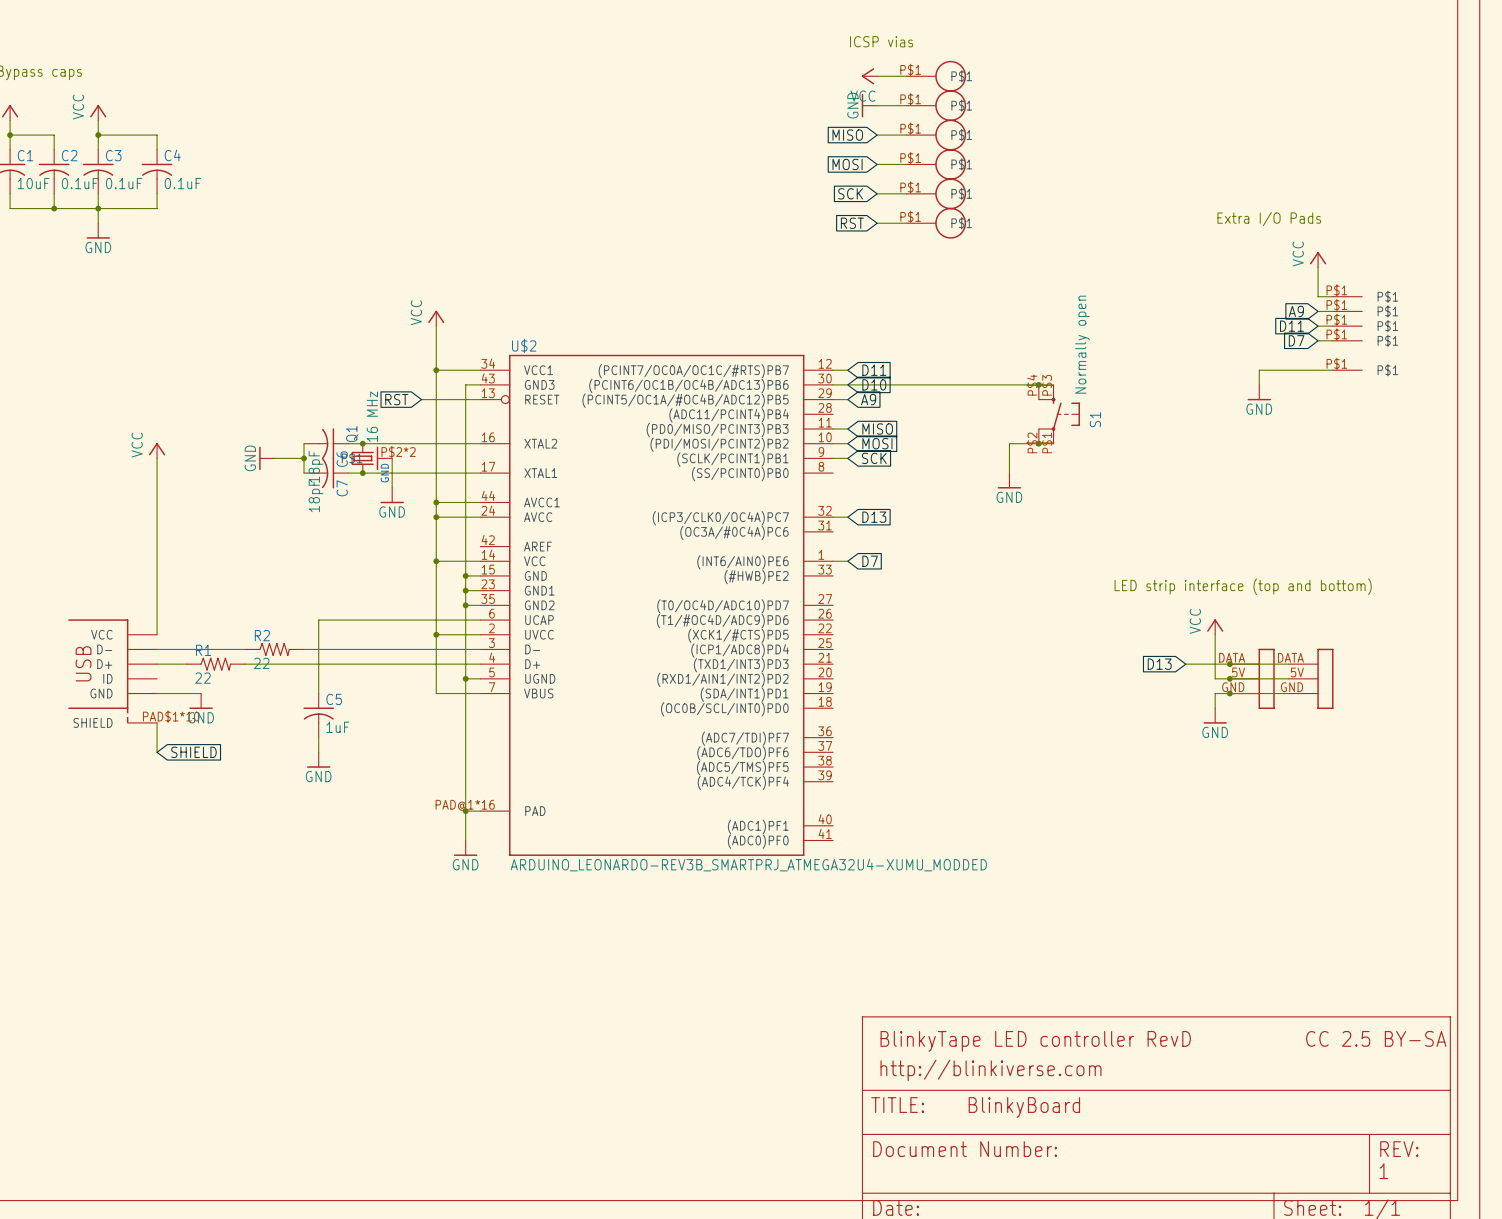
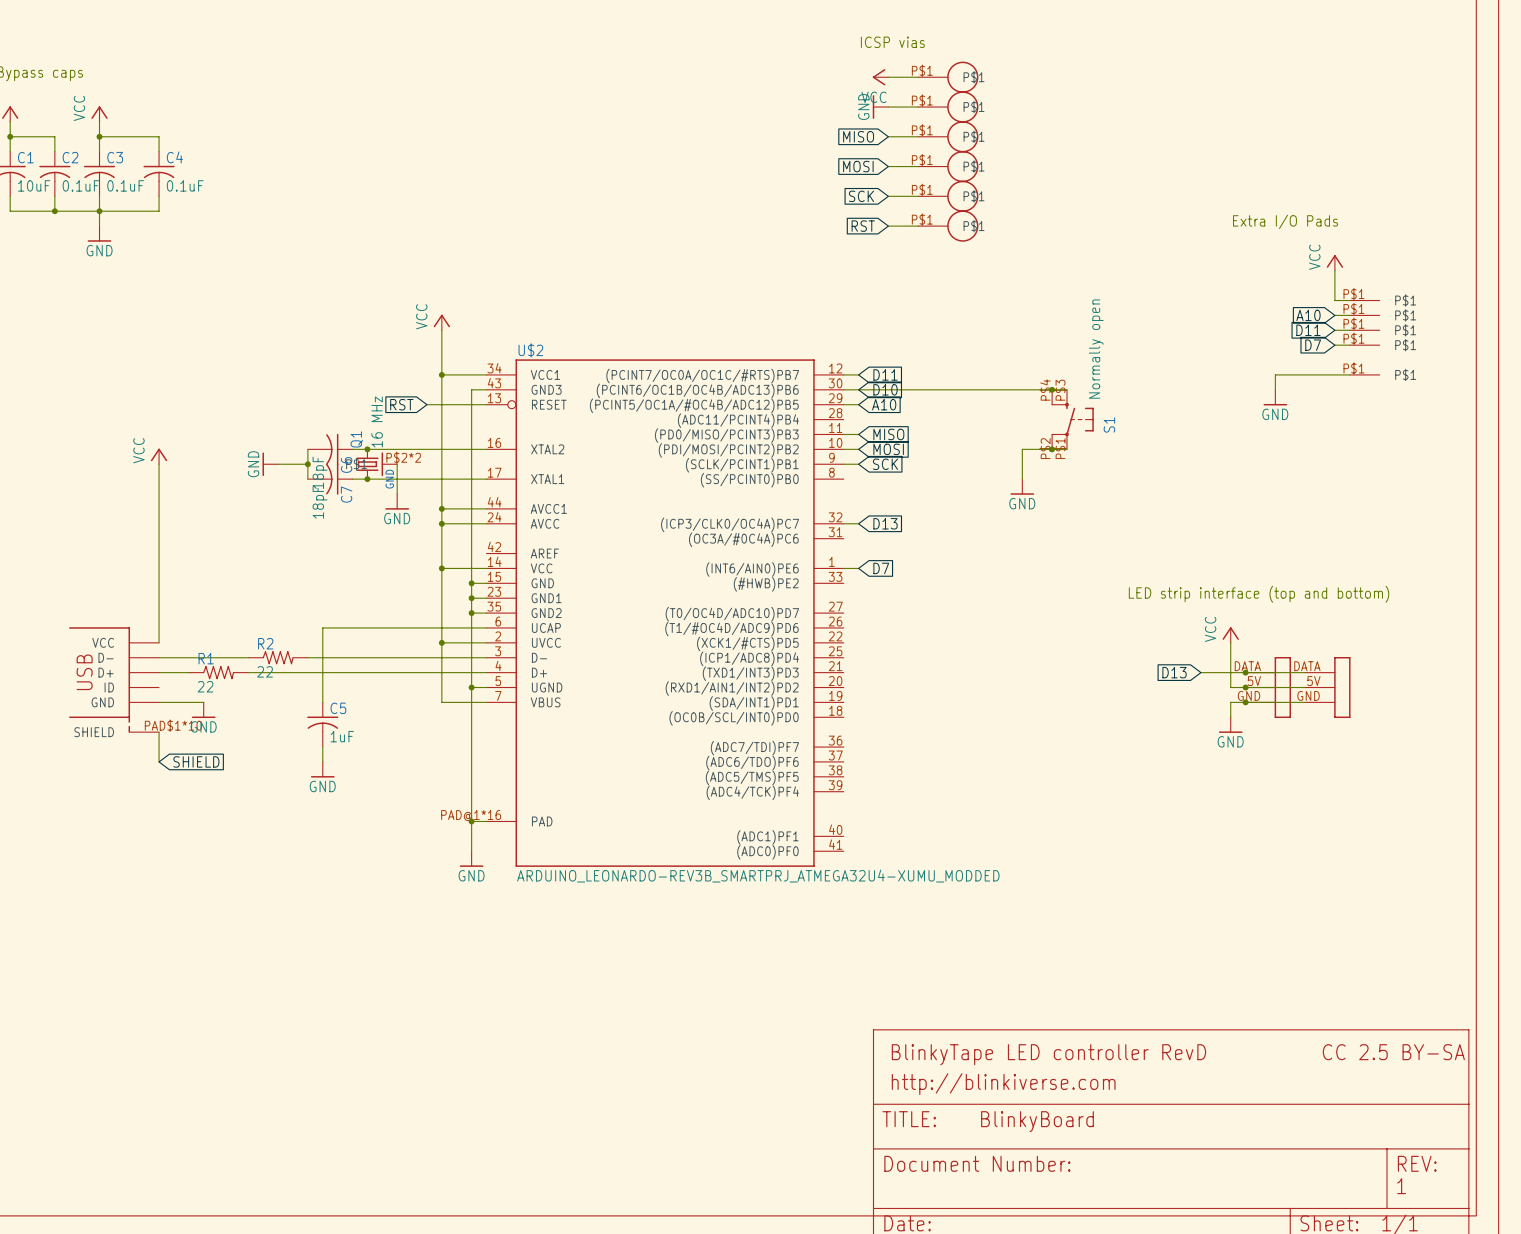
global label: A9 (1296, 311) -> A10 (1308, 315)
global label: A9 (868, 399) -> A10 (884, 404)

